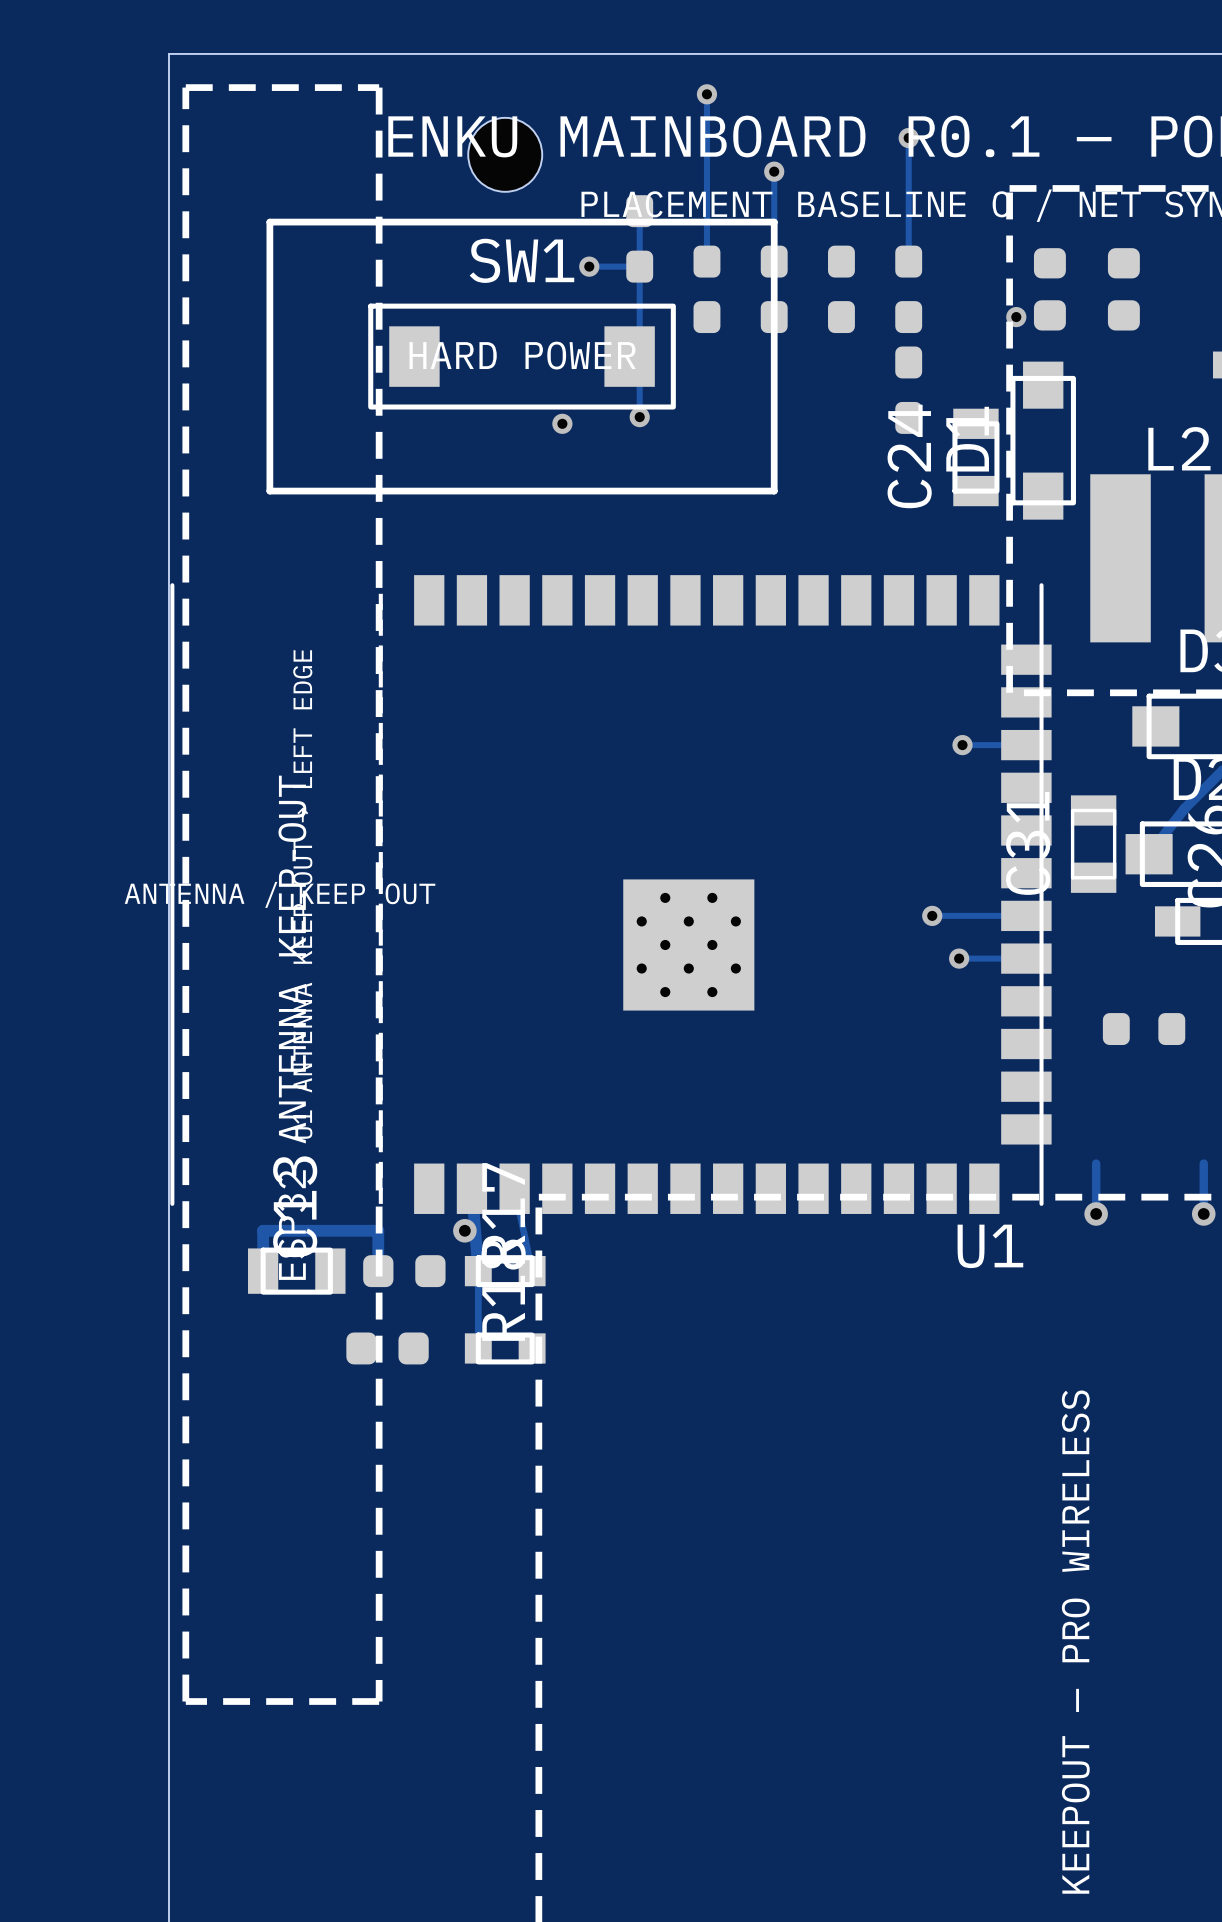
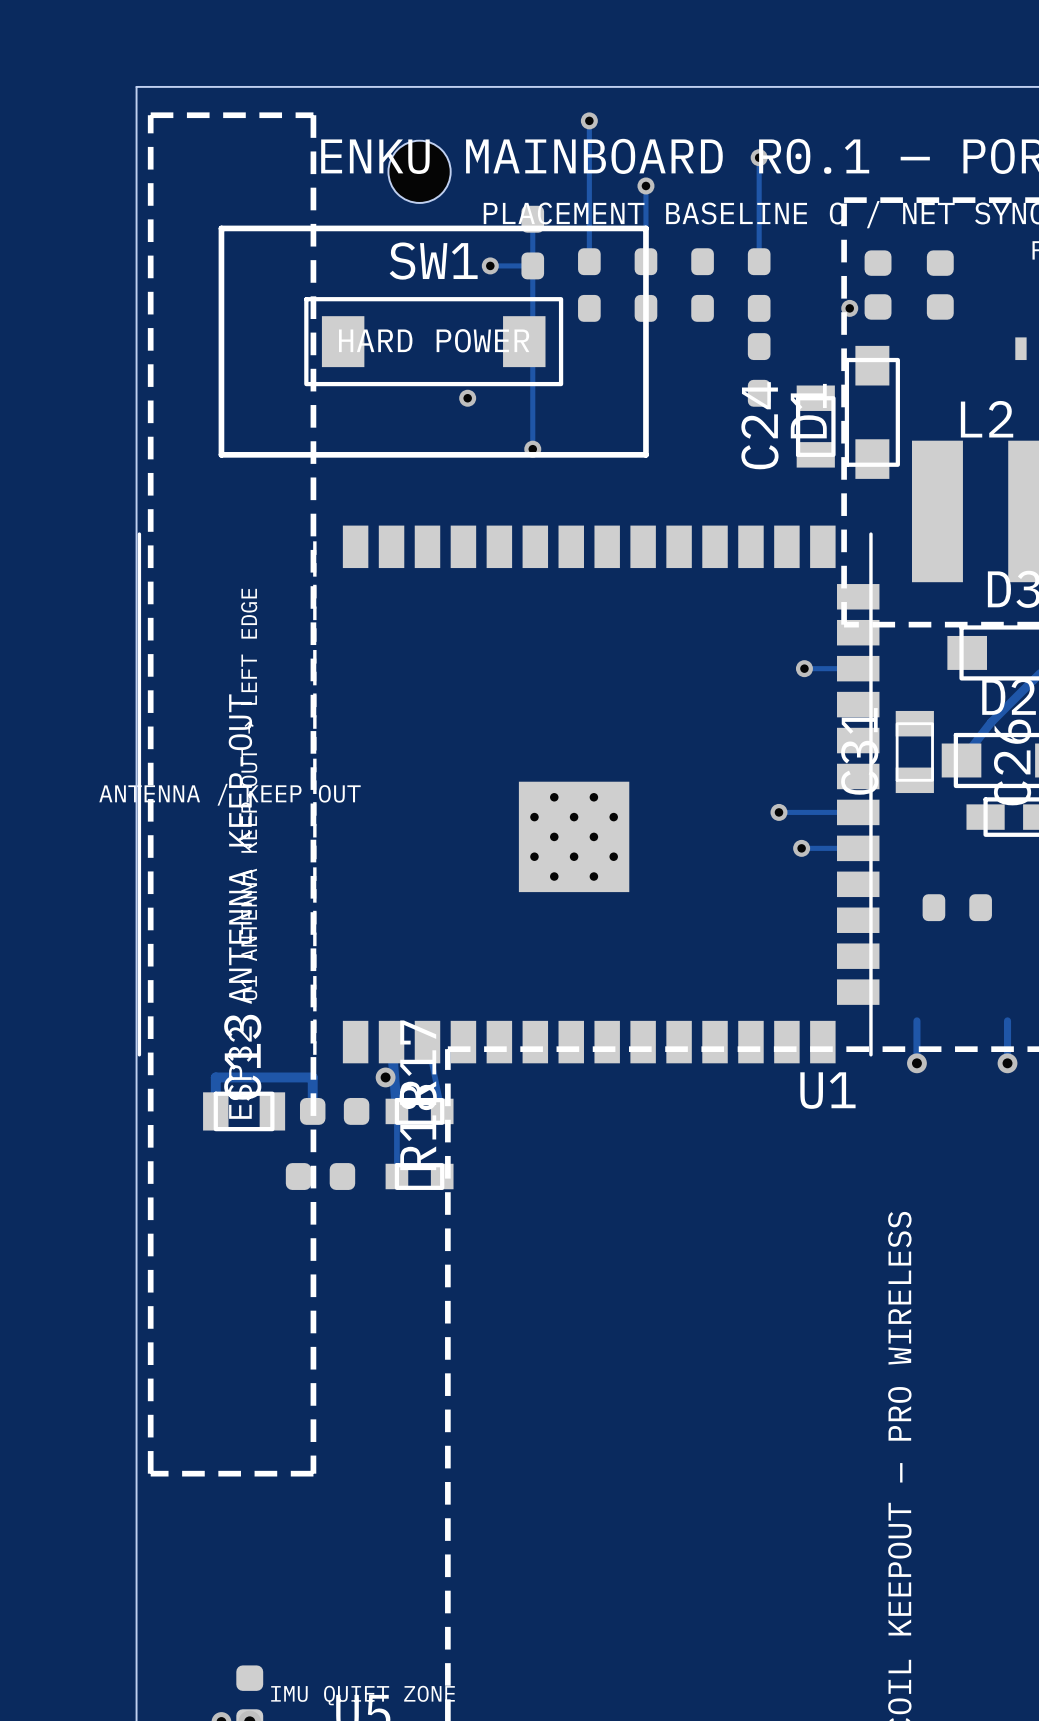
track: none -> (532, 392) (532, 449)
via: (639, 417) -> none
via: none -> (532, 449)

